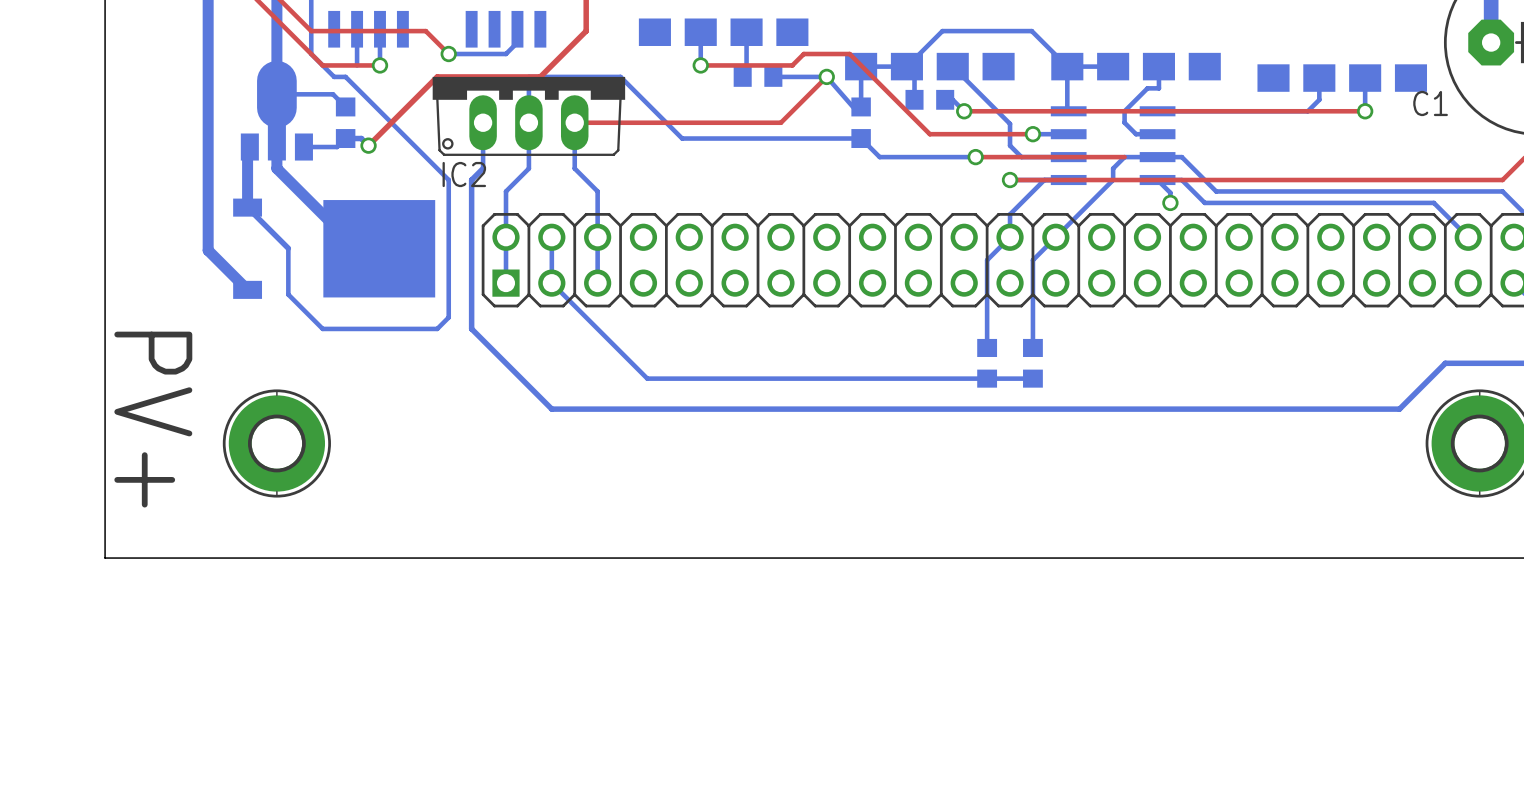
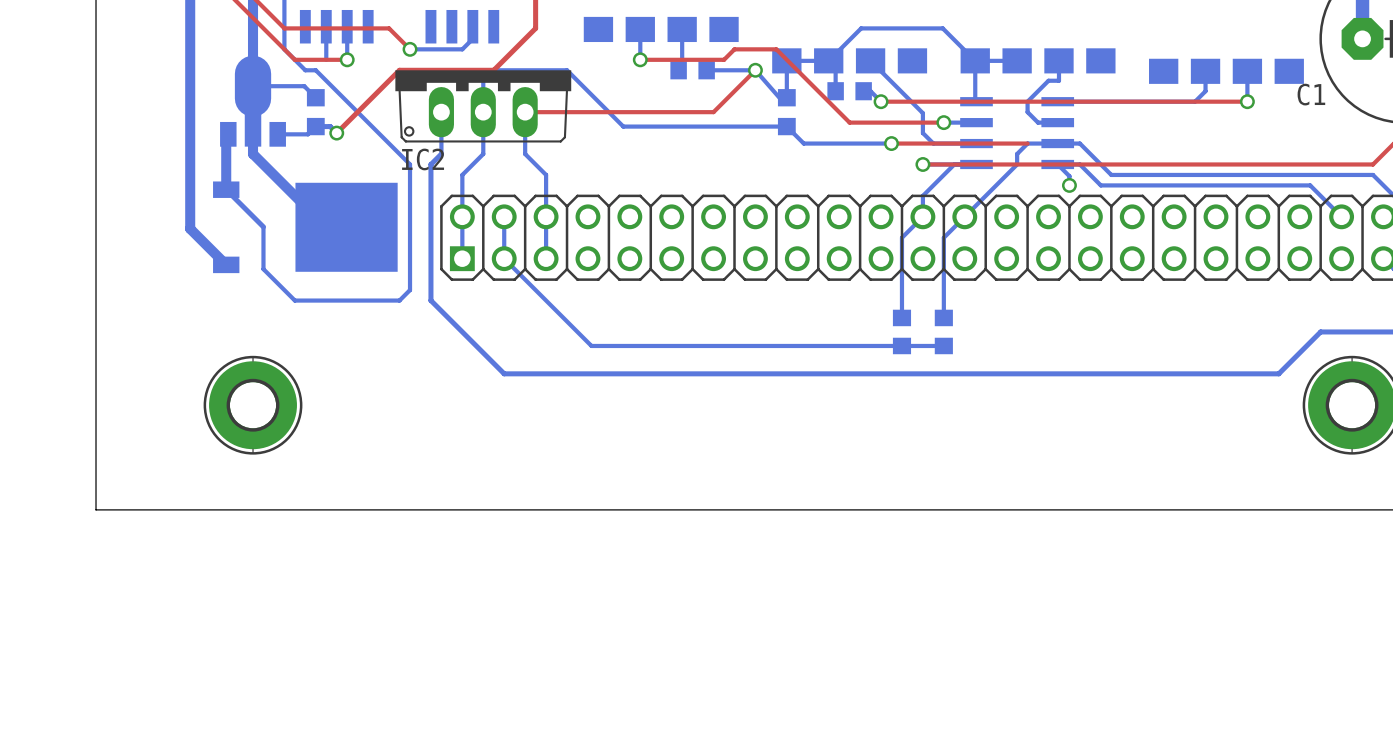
text: PV+ (153, 419) -> none

